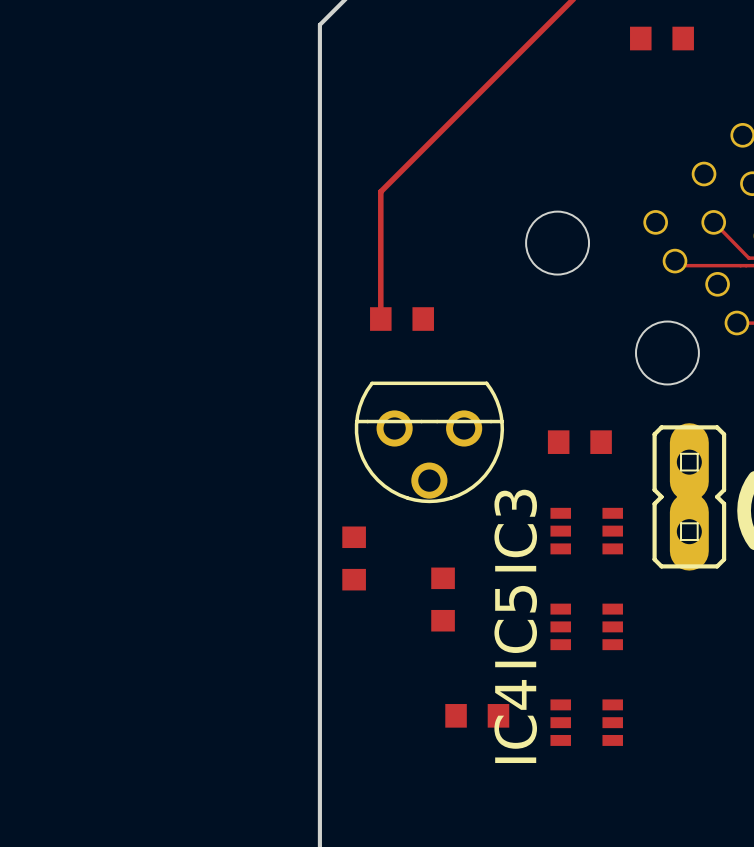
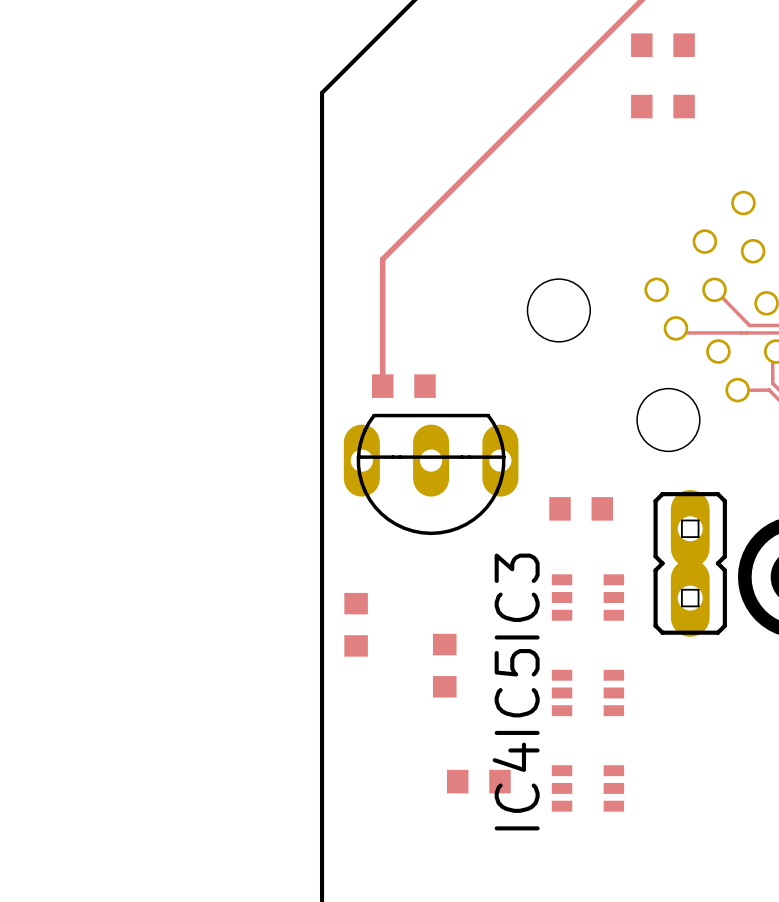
part: none -> (431, 474)
part: (429, 442) -> none

